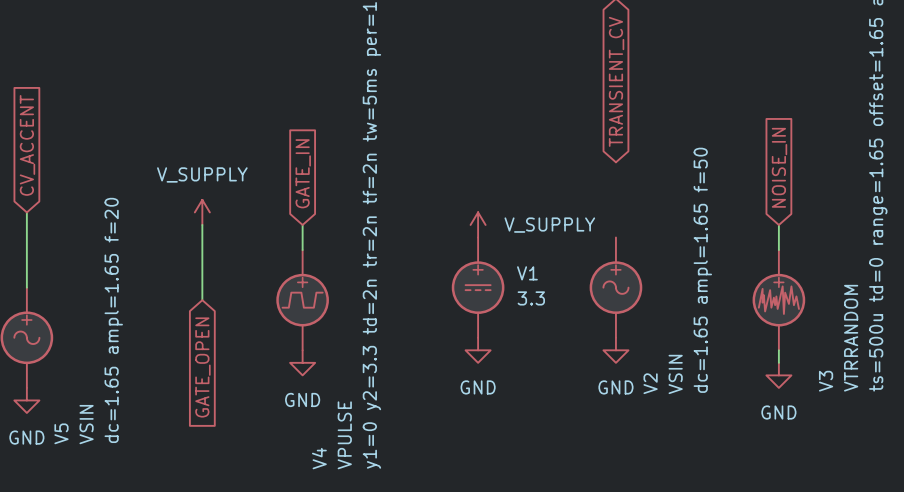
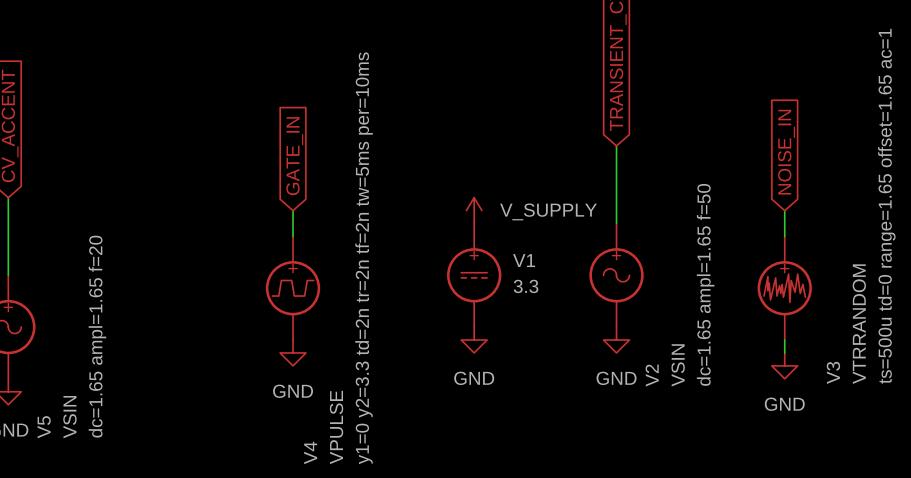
wire: none -> (616, 145) (616, 223)
power symbol: V_SUPPLY (202, 212) -> none
wire: (202, 224) (202, 300) -> none
global label: GATE_OPEN (202, 367) -> none

